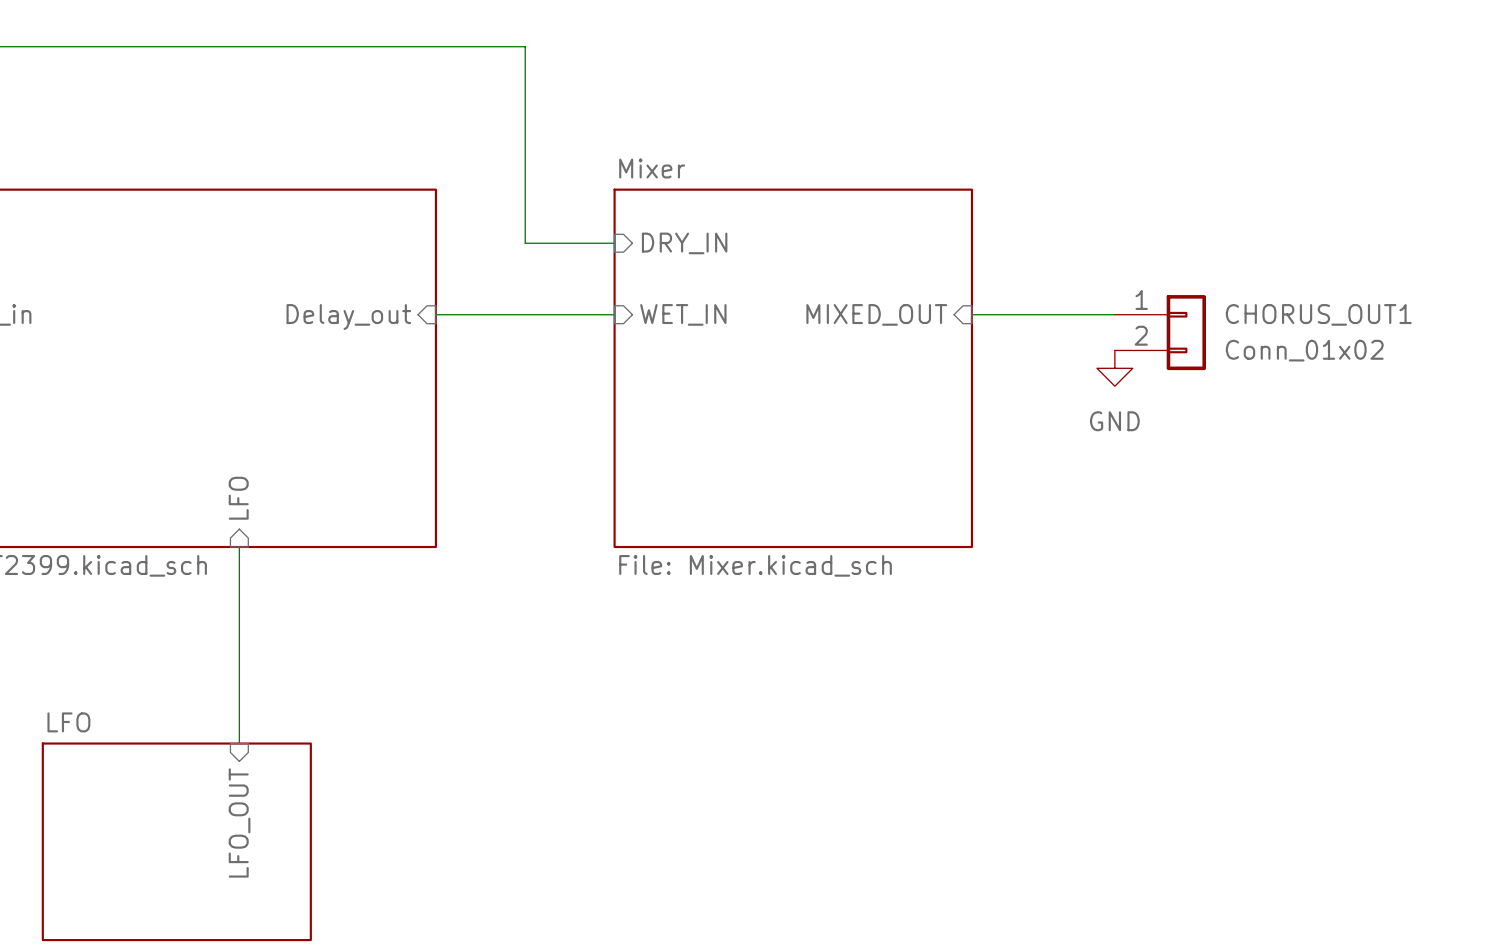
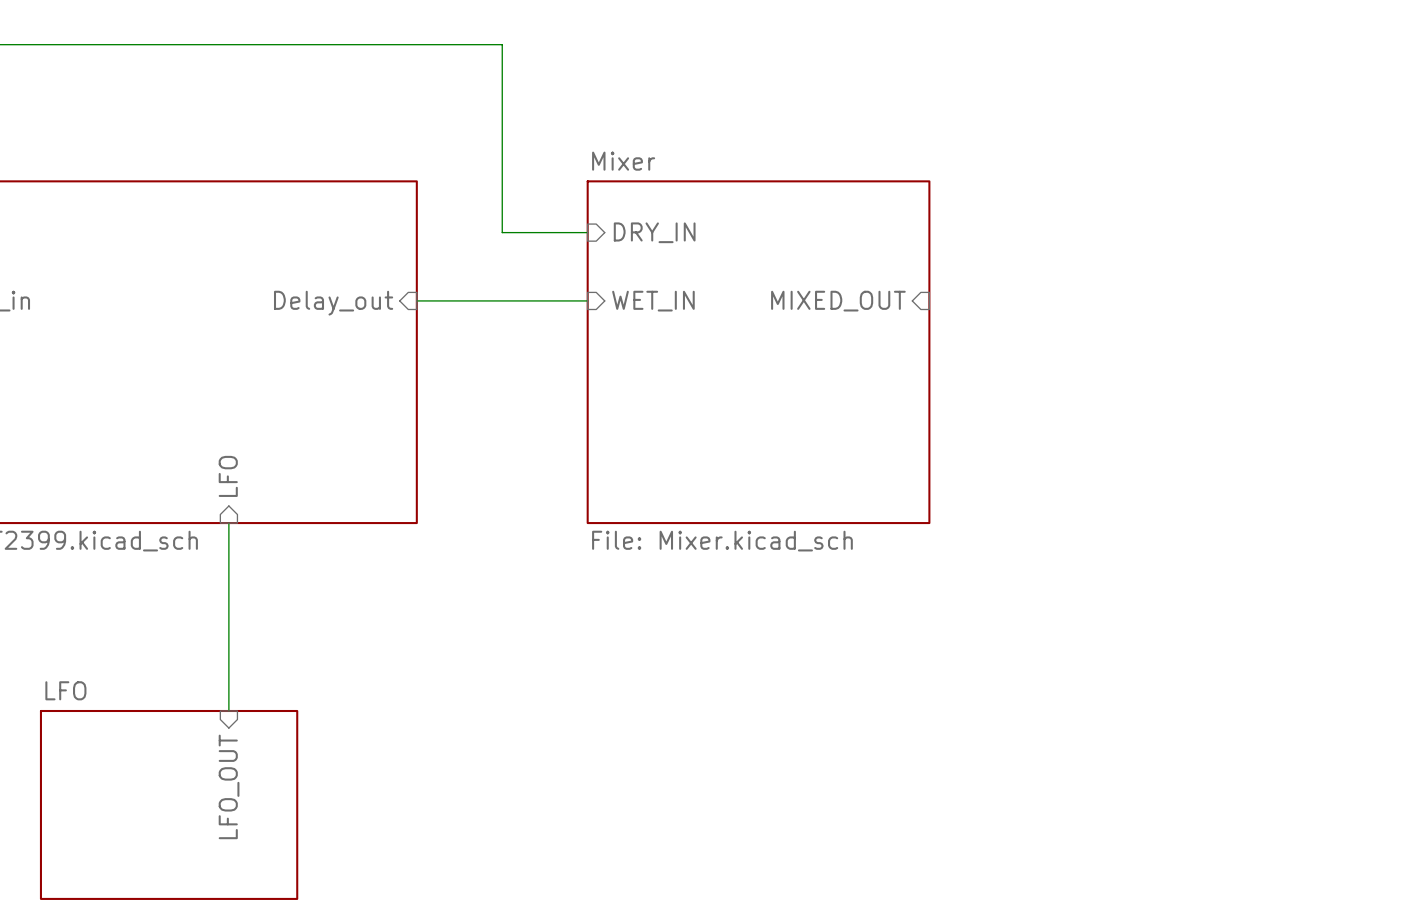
wire: (971, 314) (1114, 314) -> none
CHORUS_OUT1: Conn_01x02 (1160, 332) -> none
power symbol: GND (1114, 368) -> none

